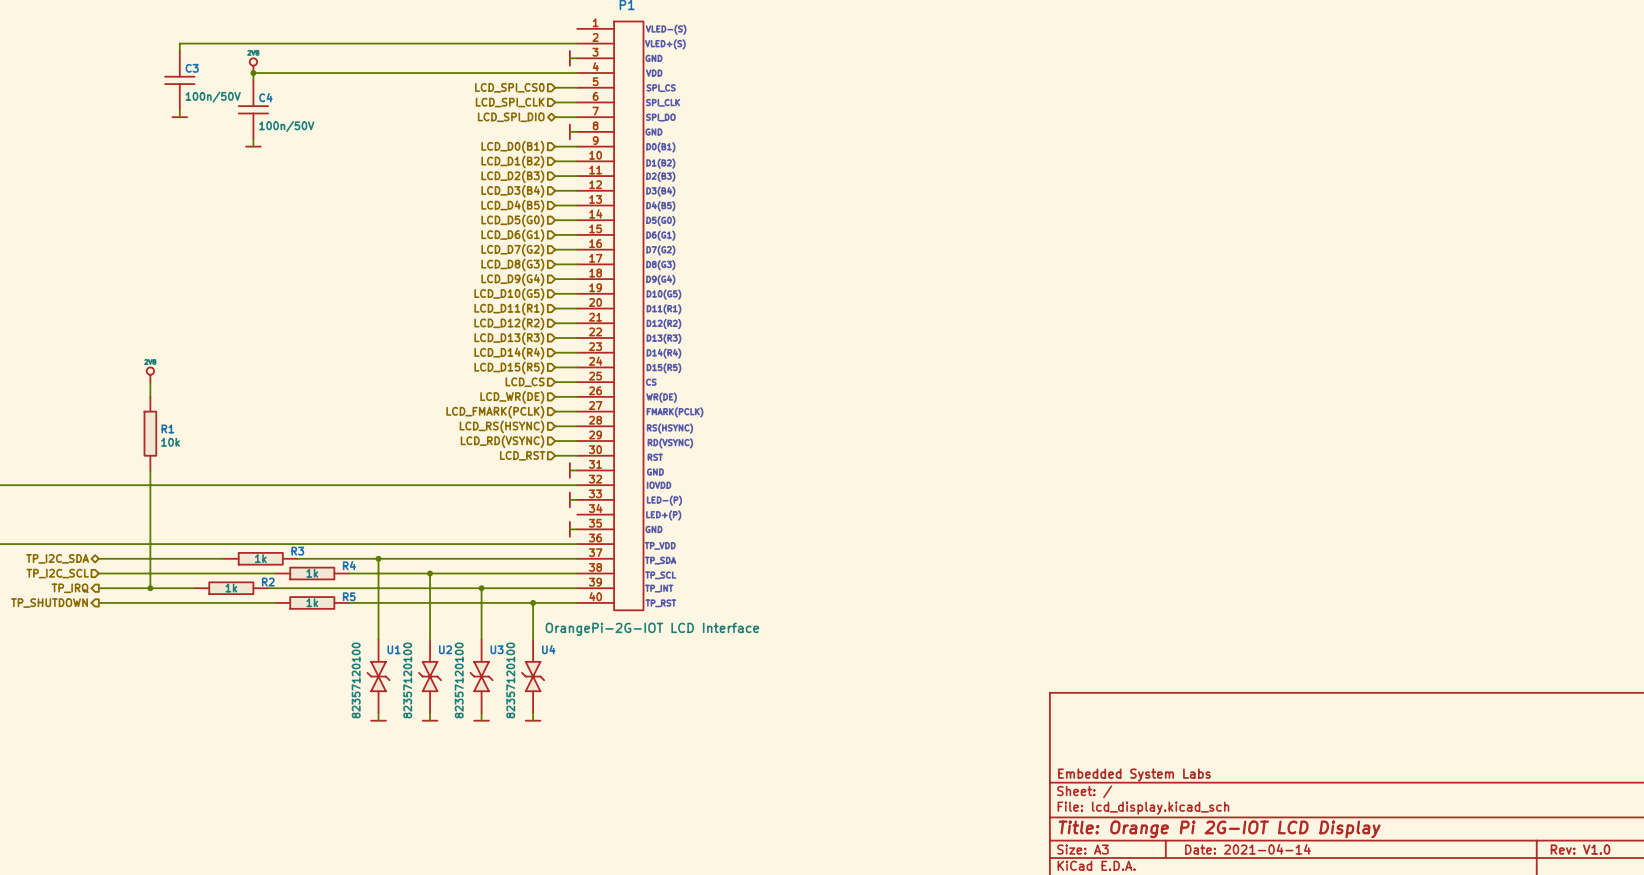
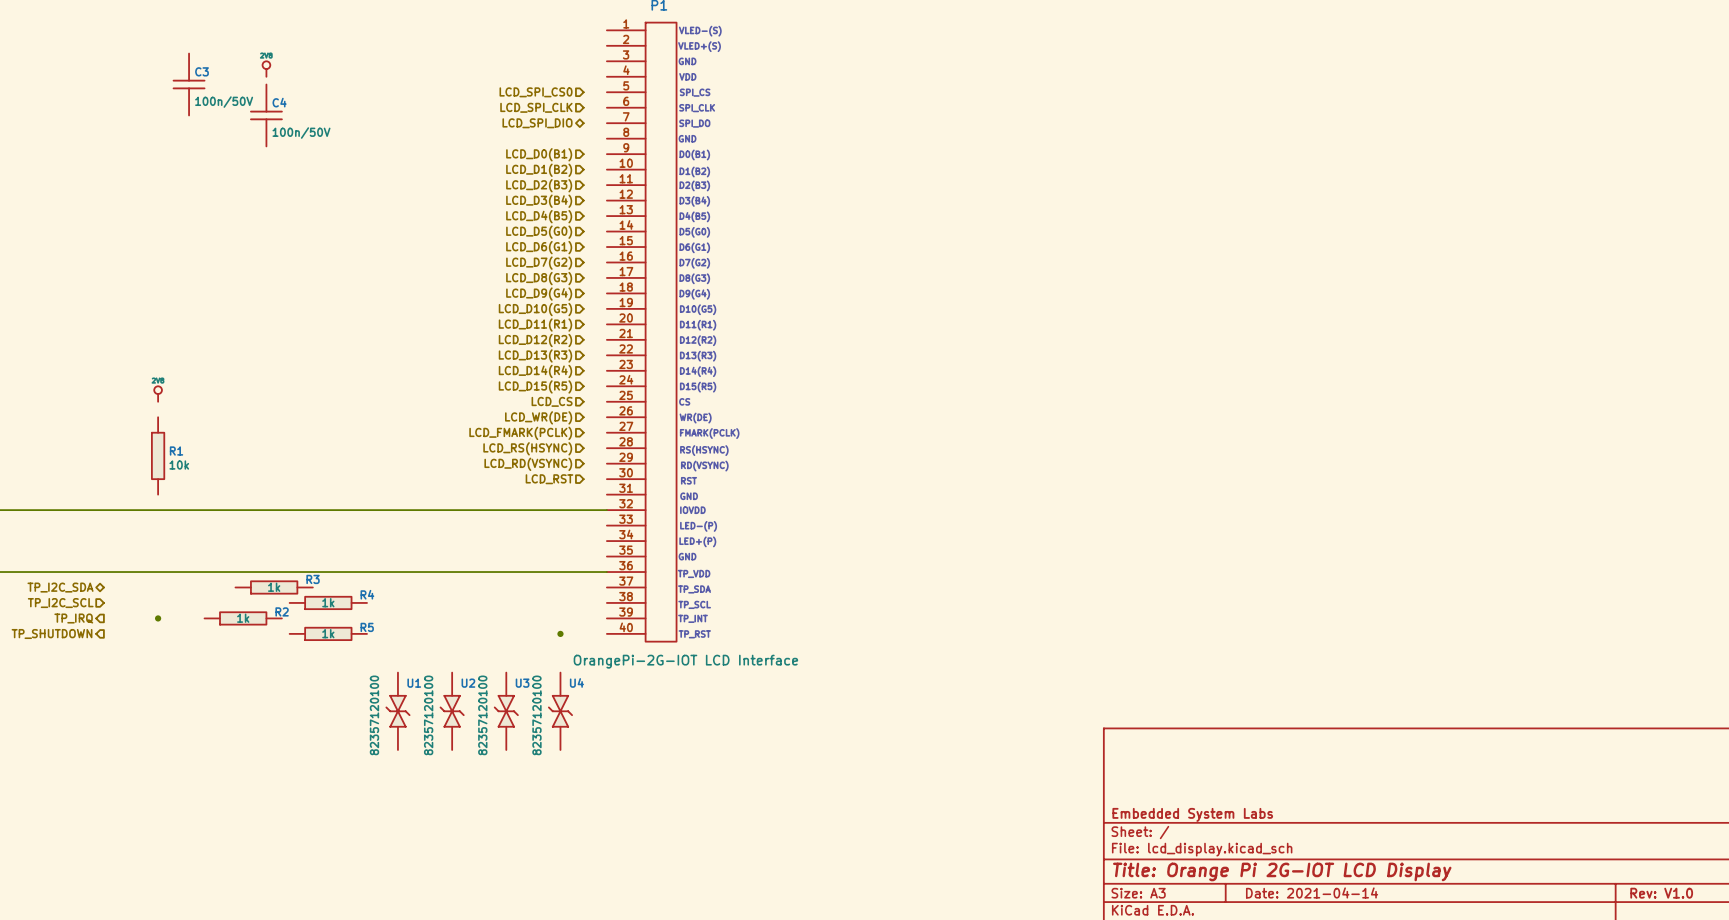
wire: (577, 43) (179, 43) (179, 50) -> none
wire: (569, 58) (577, 58) -> none
power symbol: (569, 58) -> none
junction: (253, 73) -> none
wire: (577, 73) (253, 73) (253, 80) -> none
wire: (555, 87) (577, 87) -> none
wire: (555, 102) (577, 102) -> none
wire: (179, 109) (179, 117) -> none
power symbol: (179, 117) -> none
wire: (555, 117) (577, 117) -> none
wire: (569, 131) (577, 131) -> none
power symbol: (569, 131) -> none
wire: (253, 139) (253, 146) -> none
power symbol: (253, 146) -> none
wire: (555, 146) (577, 146) -> none
wire: (555, 161) (577, 161) -> none
wire: (555, 176) (577, 176) -> none
wire: (555, 190) (577, 190) -> none
wire: (555, 205) (577, 205) -> none
wire: (555, 220) (577, 220) -> none
wire: (555, 234) (577, 234) -> none
wire: (555, 249) (577, 249) -> none
wire: (555, 264) (577, 264) -> none
wire: (555, 279) (577, 279) -> none
wire: (555, 293) (577, 293) -> none
wire: (555, 308) (577, 308) -> none
wire: (555, 323) (577, 323) -> none
wire: (555, 337) (577, 337) -> none
wire: (555, 352) (577, 352) -> none
wire: (555, 367) (577, 367) -> none
wire: (150, 382) (150, 396) -> none
wire: (555, 382) (577, 382) -> none
wire: (555, 396) (577, 396) -> none
wire: (555, 411) (577, 411) -> none
wire: (555, 426) (577, 426) -> none
wire: (555, 441) (577, 441) -> none
wire: (555, 455) (577, 455) -> none
wire: (150, 470) (150, 588) -> none
wire: (569, 470) (577, 470) -> none
power symbol: (569, 470) -> none
wire: (569, 499) (577, 499) -> none
power symbol: (569, 499) -> none
wire: (569, 529) (577, 529) -> none
power symbol: (569, 529) -> none
wire: (98, 558) (223, 558) -> none
wire: (297, 558) (577, 558) -> none
wire: (378, 558) (378, 639) -> none
junction: (378, 558) -> none
wire: (98, 573) (275, 573) -> none
wire: (349, 573) (577, 573) -> none
wire: (430, 573) (430, 639) -> none
junction: (430, 573) -> none
wire: (98, 588) (194, 588) -> none
wire: (268, 588) (577, 588) -> none
wire: (481, 588) (481, 639) -> none
junction: (481, 588) -> none
wire: (98, 602) (275, 602) -> none
wire: (349, 602) (577, 602) -> none
wire: (533, 602) (533, 639) -> none
wire: (378, 713) (378, 720) -> none
wire: (430, 713) (430, 720) -> none
wire: (481, 713) (481, 720) -> none
wire: (533, 713) (533, 720) -> none
power symbol: (378, 720) -> none
power symbol: (430, 720) -> none
power symbol: (481, 720) -> none
power symbol: (533, 720) -> none

